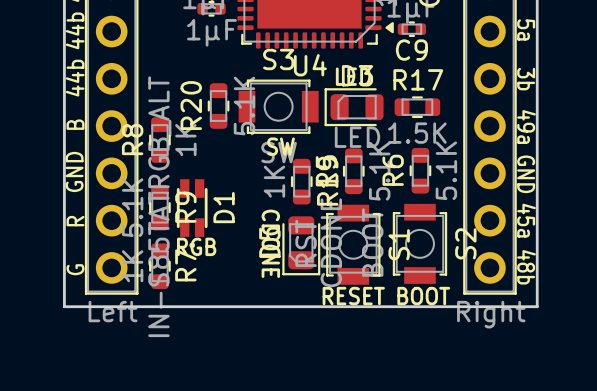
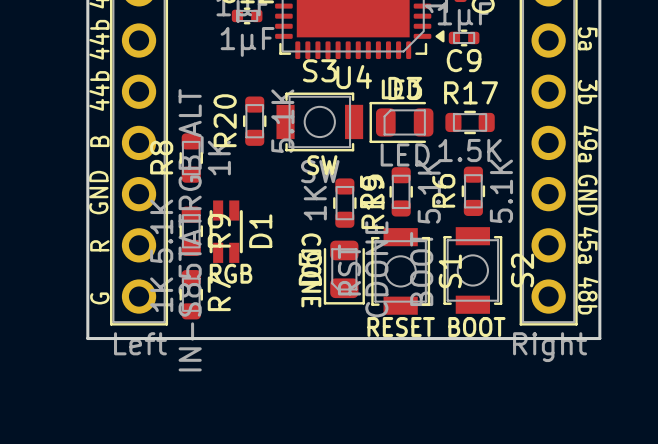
D1 footprint: [176, 179, 208, 249] -> [209, 200, 243, 263]

